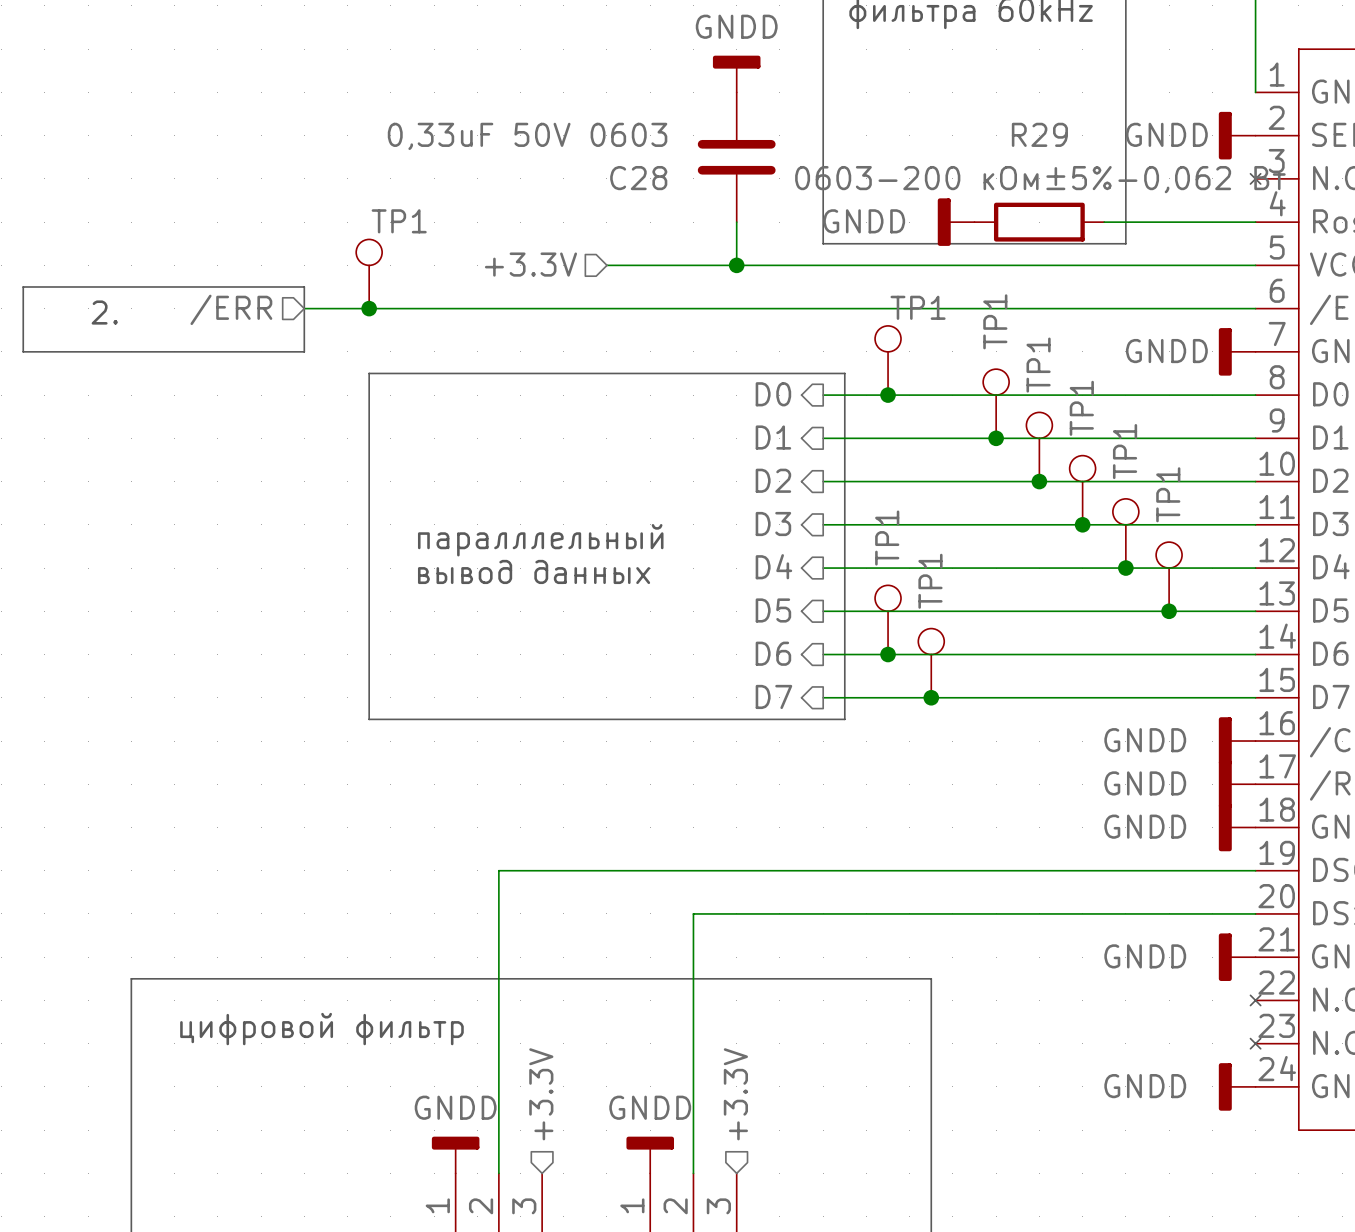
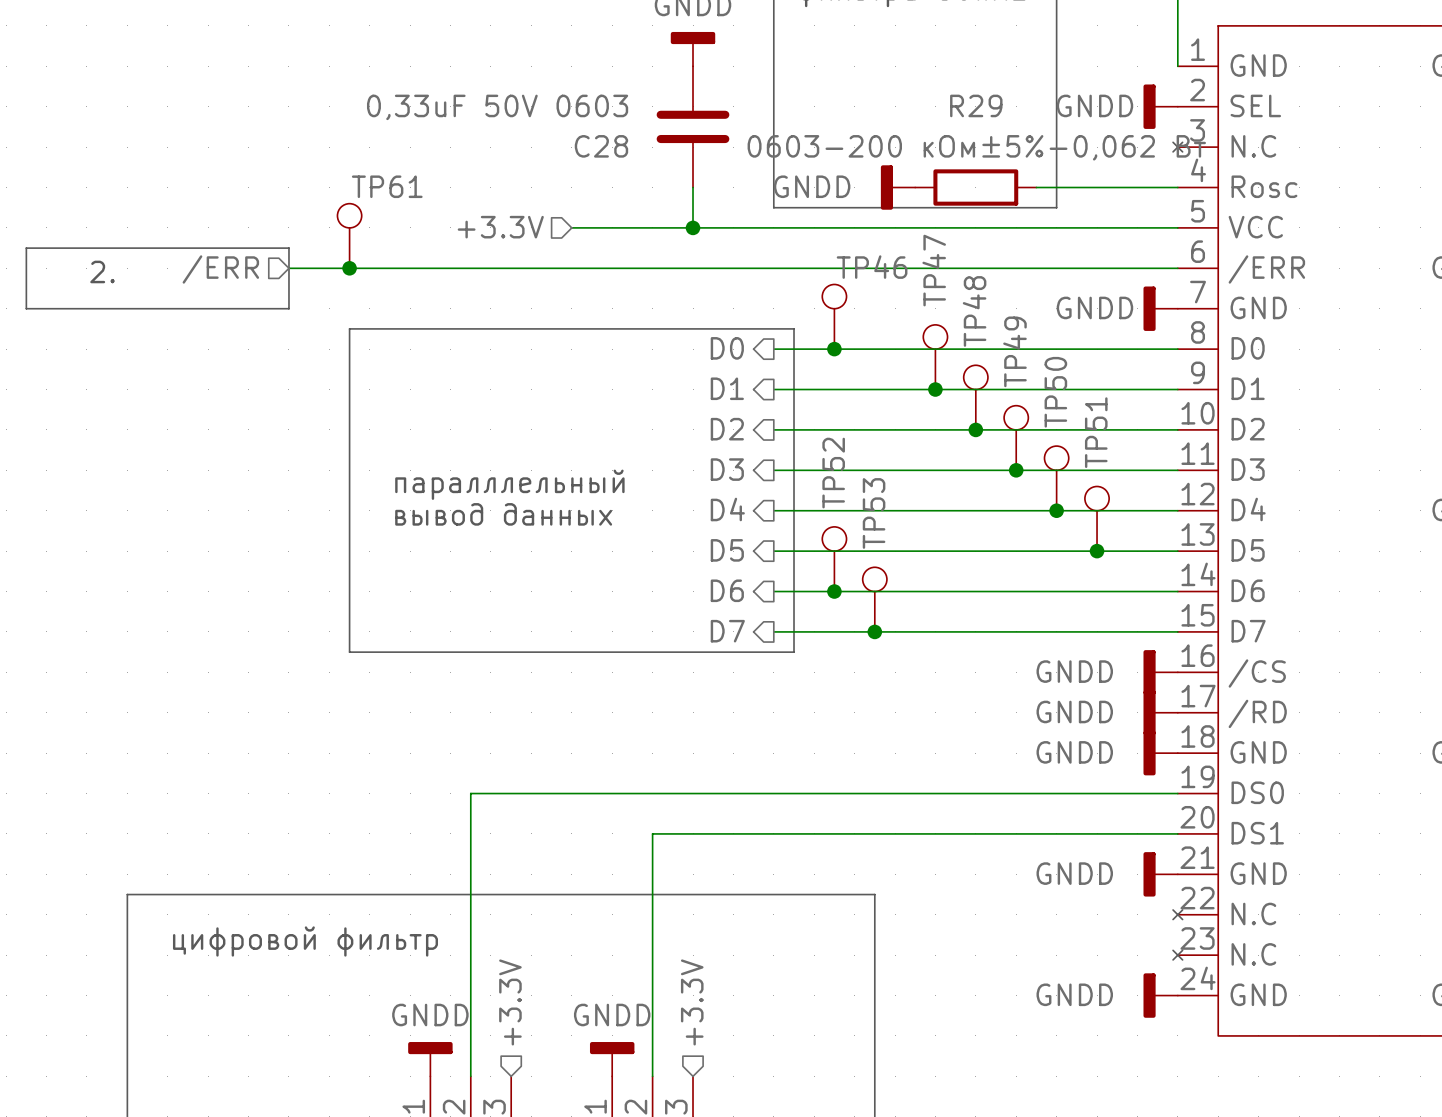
TP1 name: TP1 (399, 221) -> TP61 (387, 186)
TP1 name: TP1 (918, 307) -> TP46 (872, 267)
TP1 name: TP1 (995, 321) -> TP47 (934, 270)
TP1 name: TP1 (1038, 365) -> TP48 (974, 311)
TP1 name: TP1 (1081, 408) -> TP49 (1014, 351)
TP1 name: TP1 (1125, 451) -> TP50 (1055, 392)
TP1 name: TP1 (1168, 494) -> TP51 (1096, 432)
TP1 name: TP1 (887, 538) -> TP52 (833, 473)
TP1 name: TP1 (930, 581) -> TP53 (874, 513)

